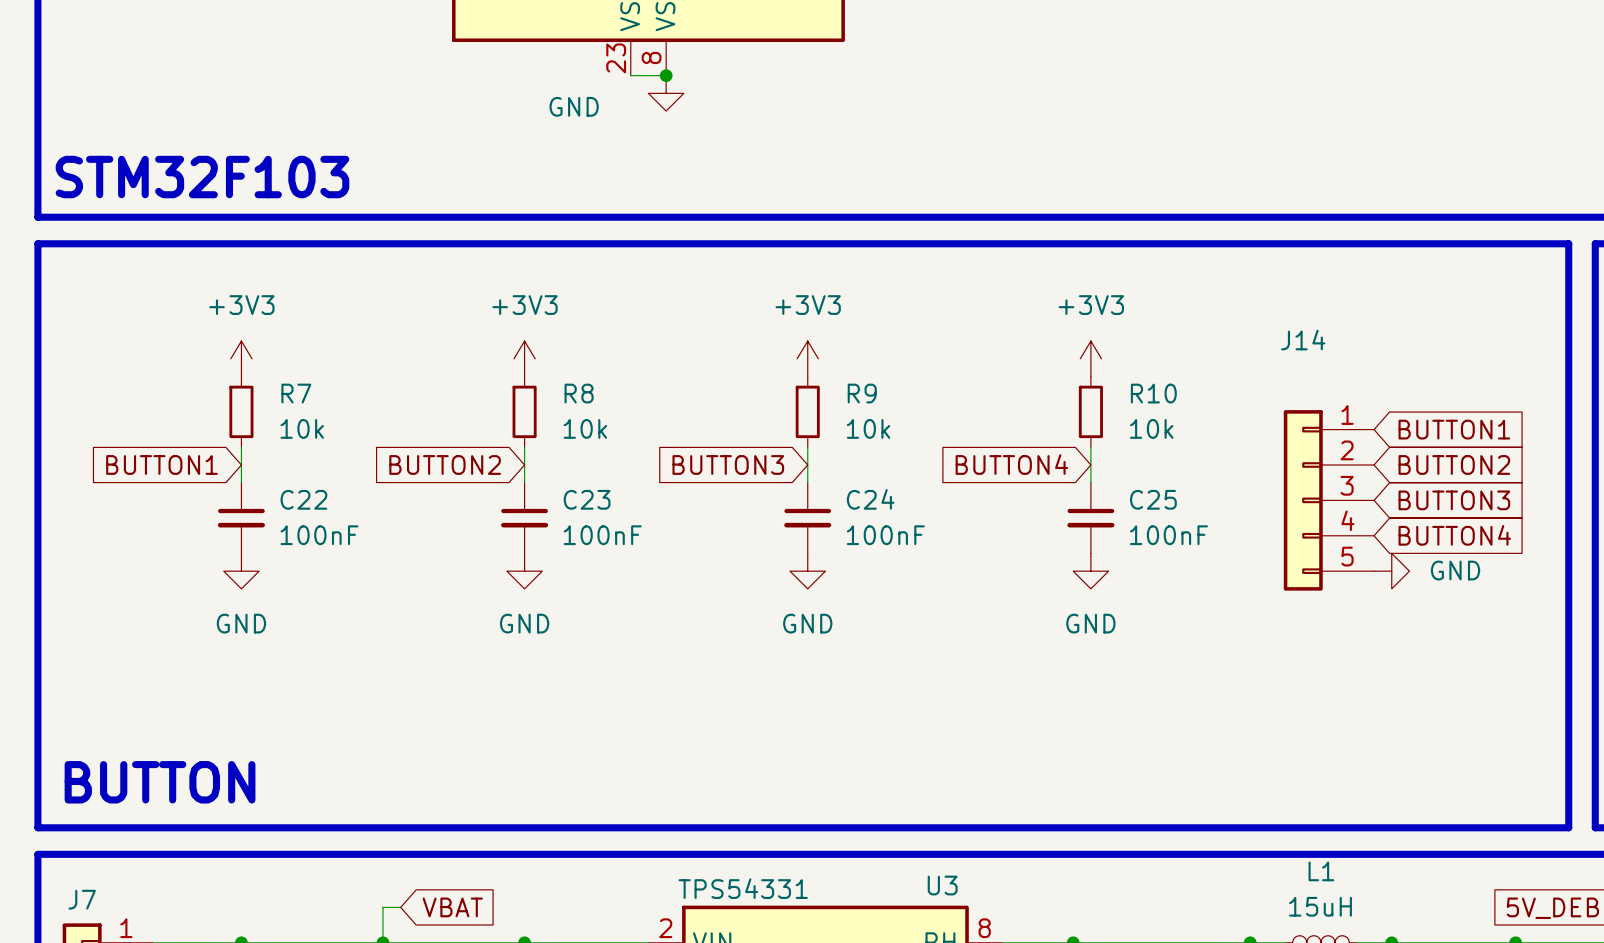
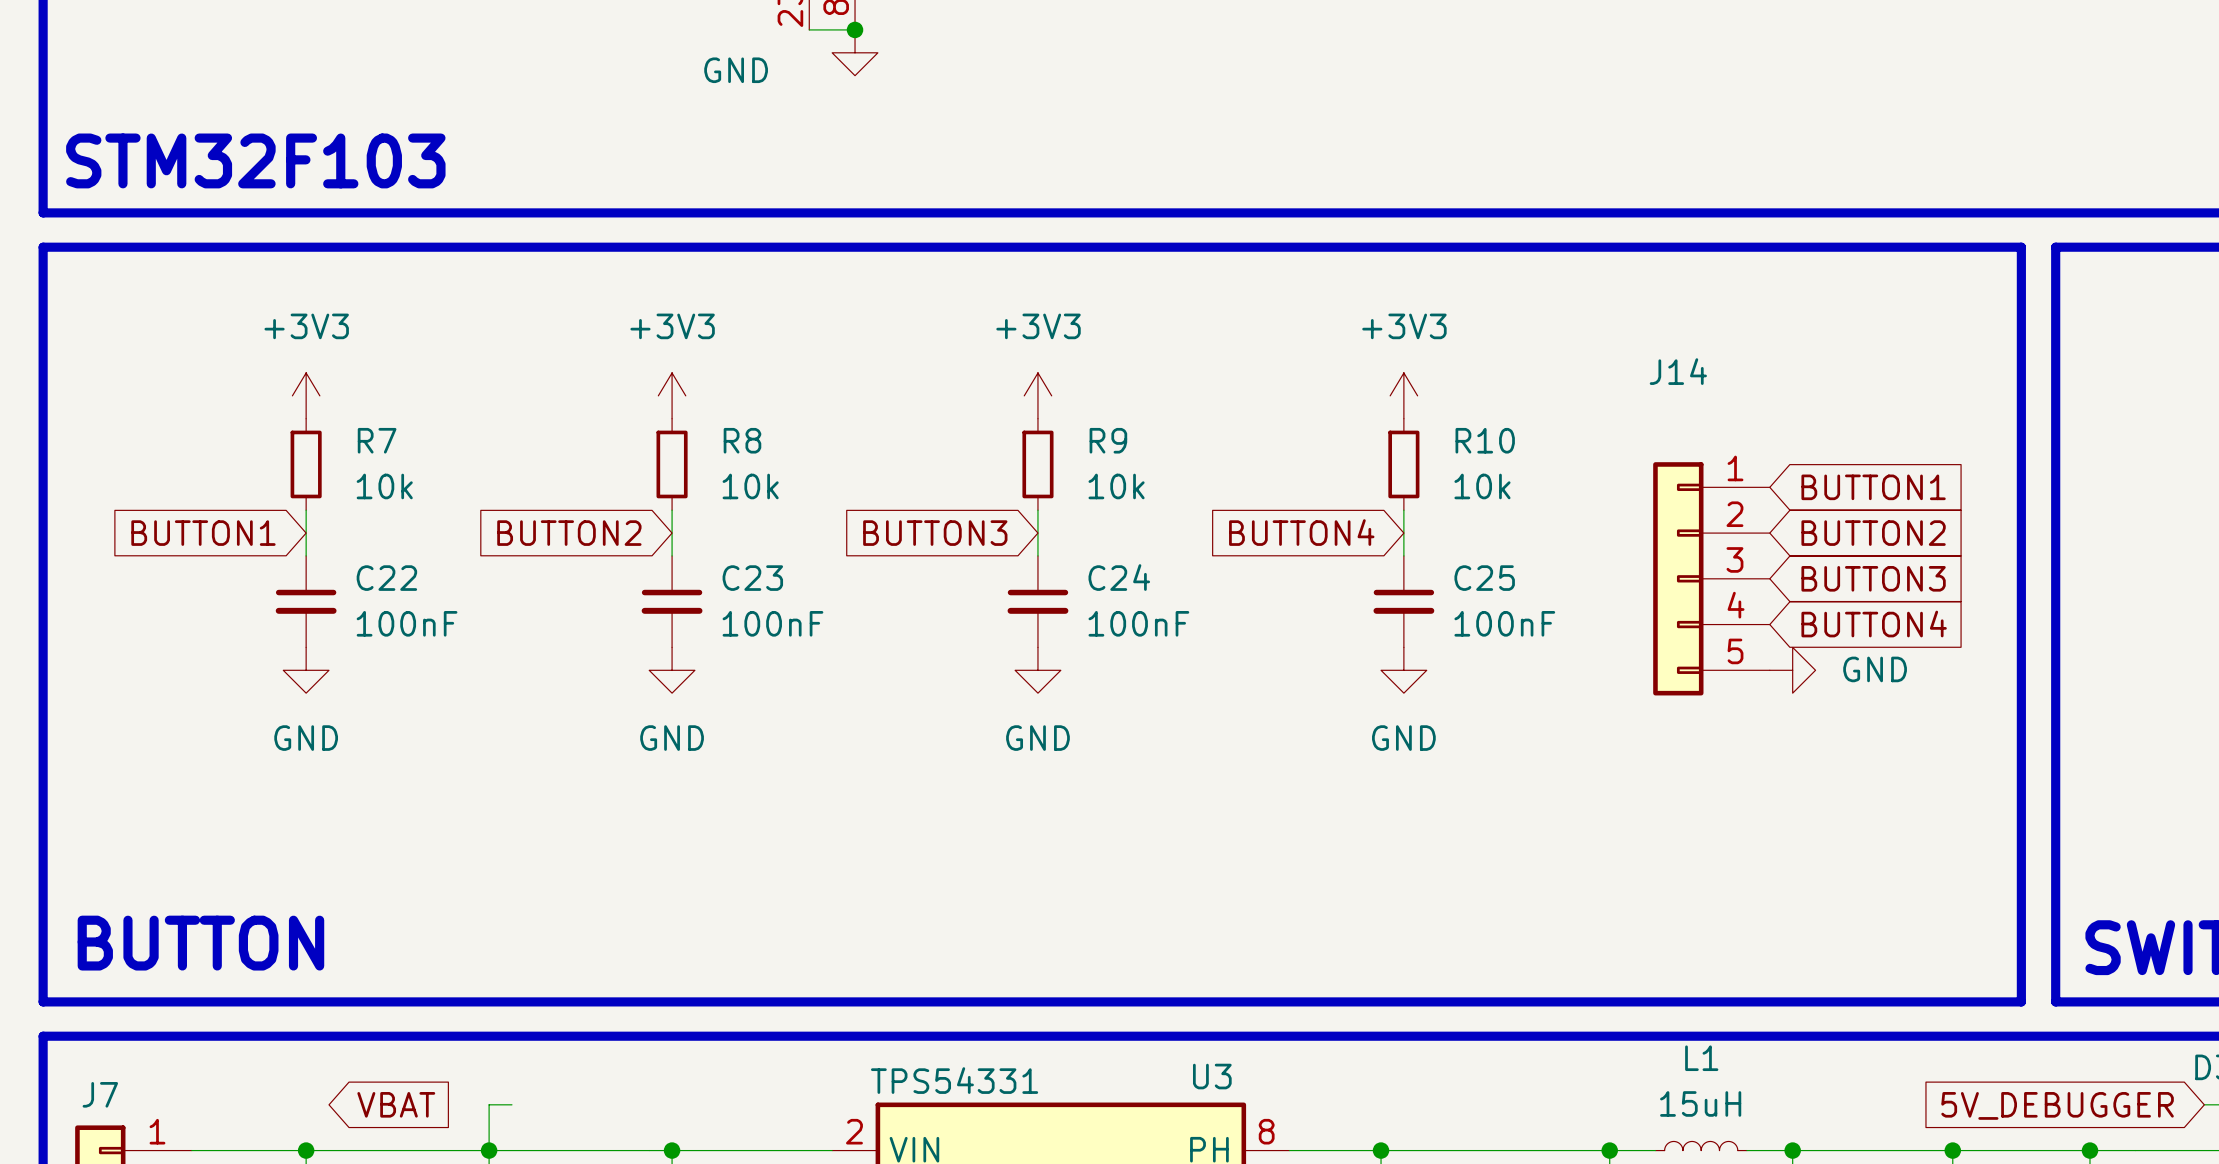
global label position: VBAT (452, 907) -> VBAT (396, 1104)

